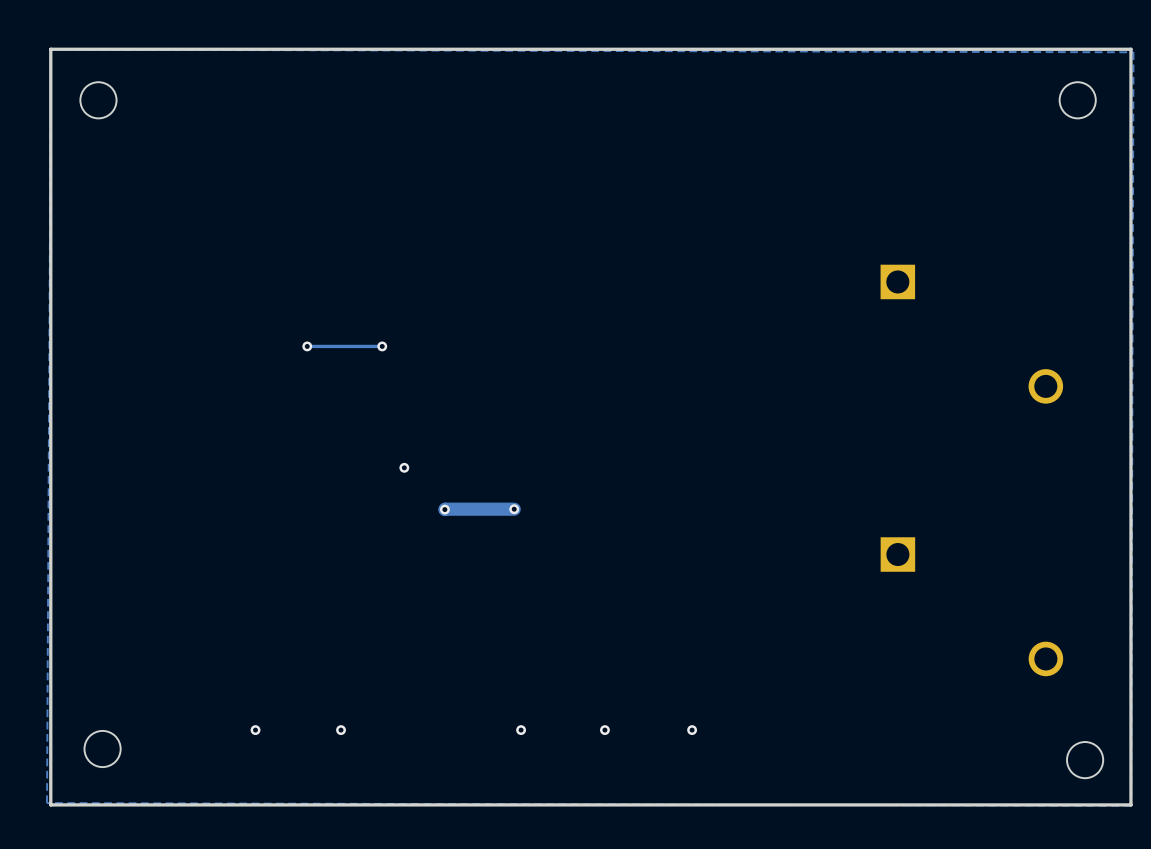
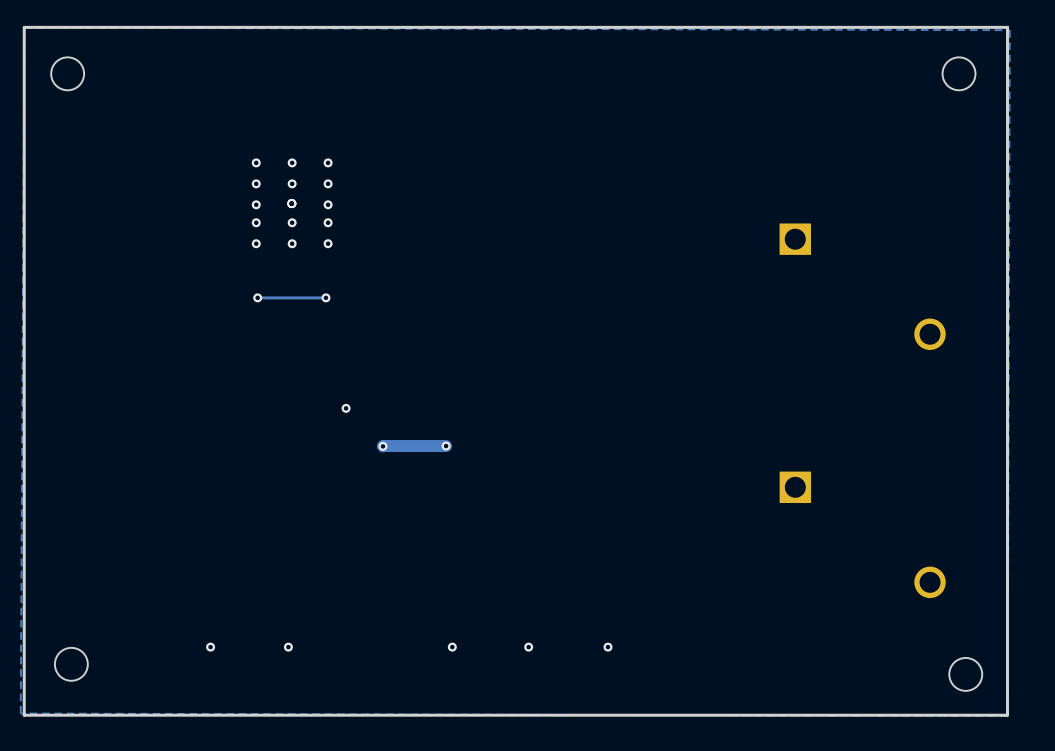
via: none -> (256, 162)
via: none -> (292, 162)
via: none -> (328, 162)
via: none -> (256, 183)
via: none -> (292, 183)
via: none -> (328, 183)
via: none -> (291, 203)
via: none -> (256, 204)
via: none -> (328, 204)
via: none -> (256, 222)
via: none -> (292, 222)
via: none -> (328, 222)
via: none -> (256, 243)
via: none -> (292, 243)
via: none -> (328, 243)

